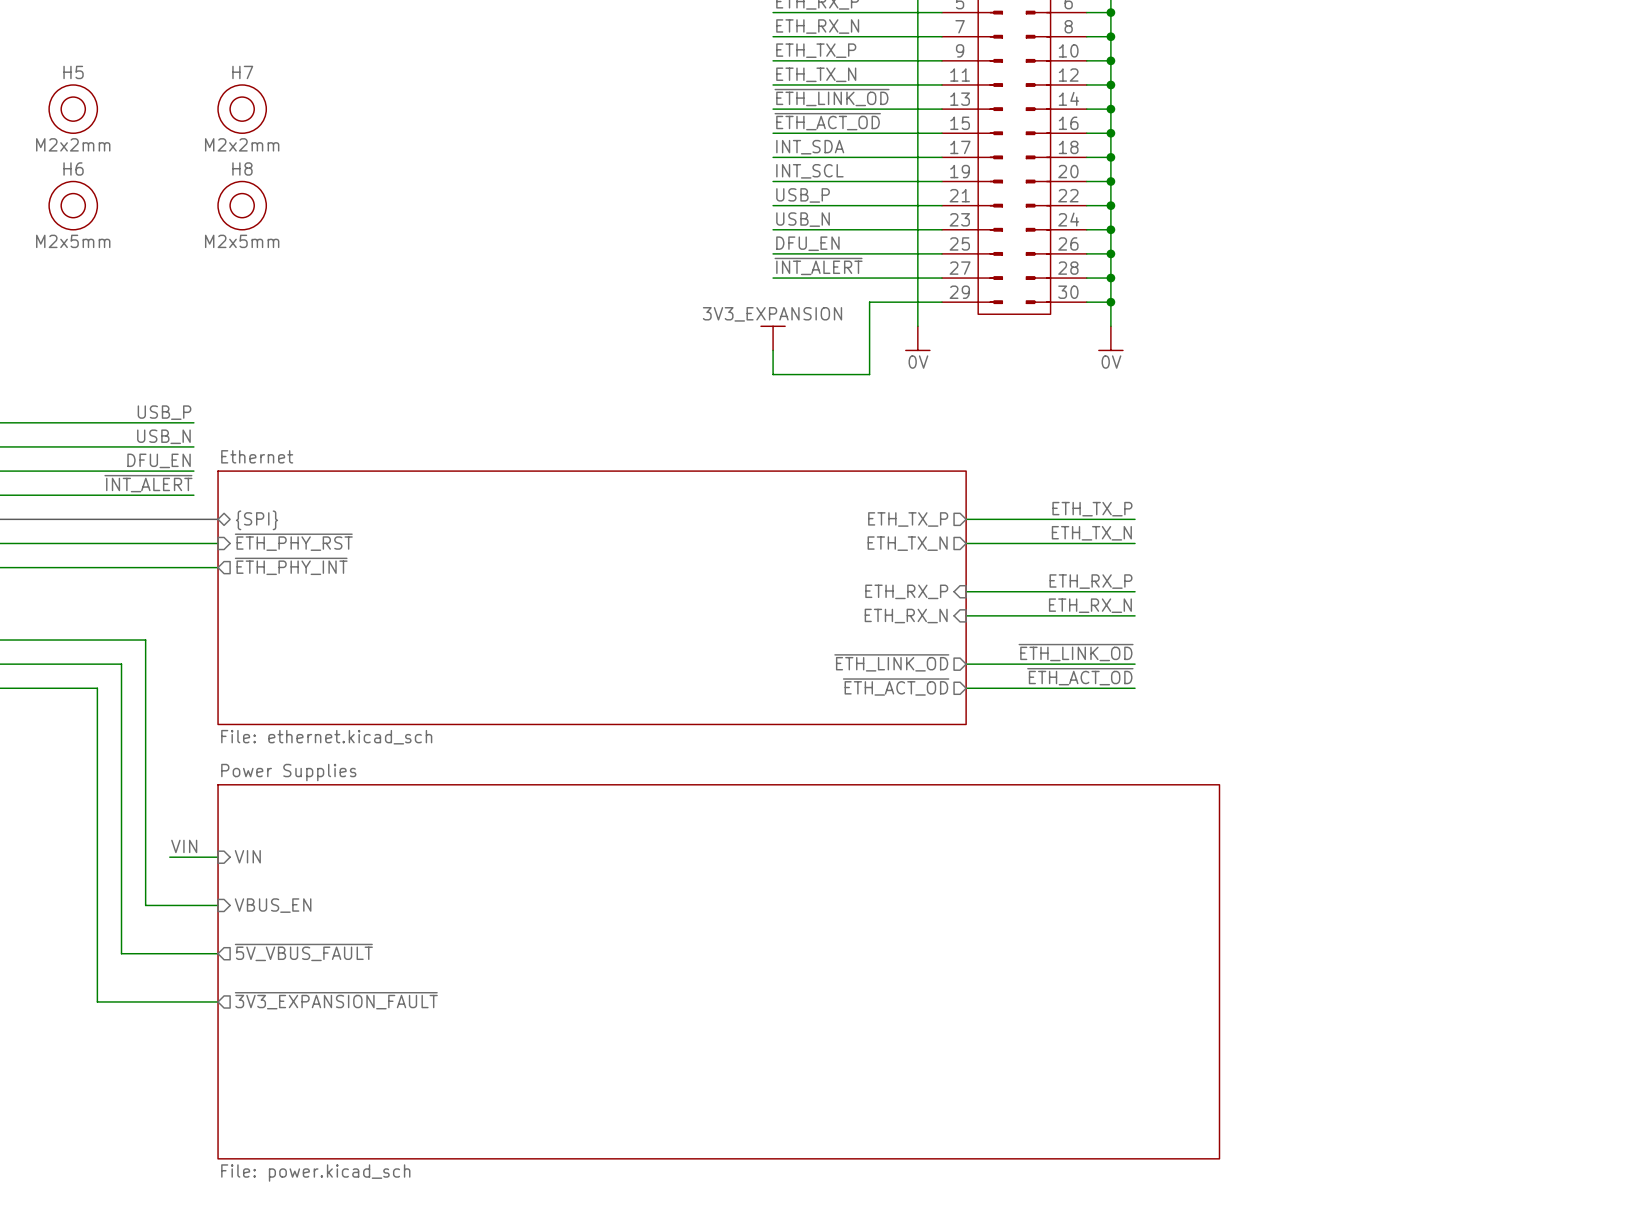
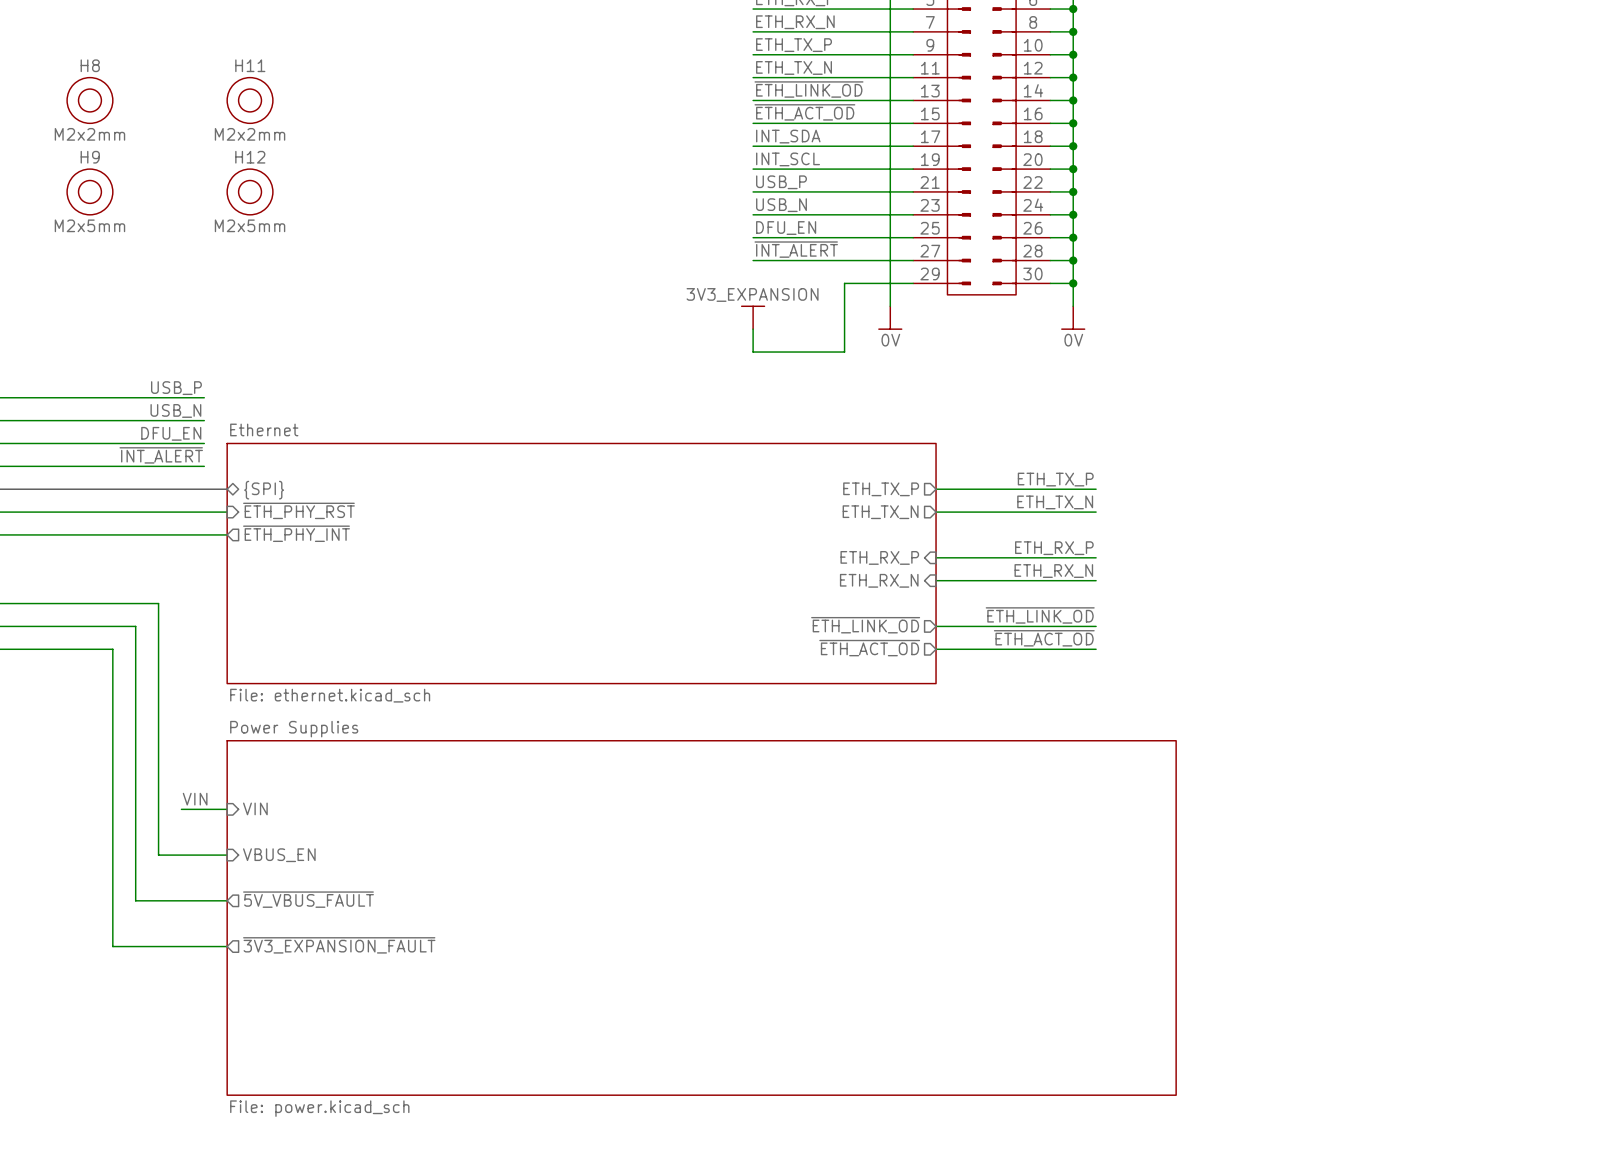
H5 name: H5 (73, 72) -> H8 (90, 65)
H7 name: H7 (242, 72) -> H11 (250, 65)
H6 name: H6 (73, 168) -> H9 (90, 157)
H8 name: H8 (242, 168) -> H12 (250, 157)

